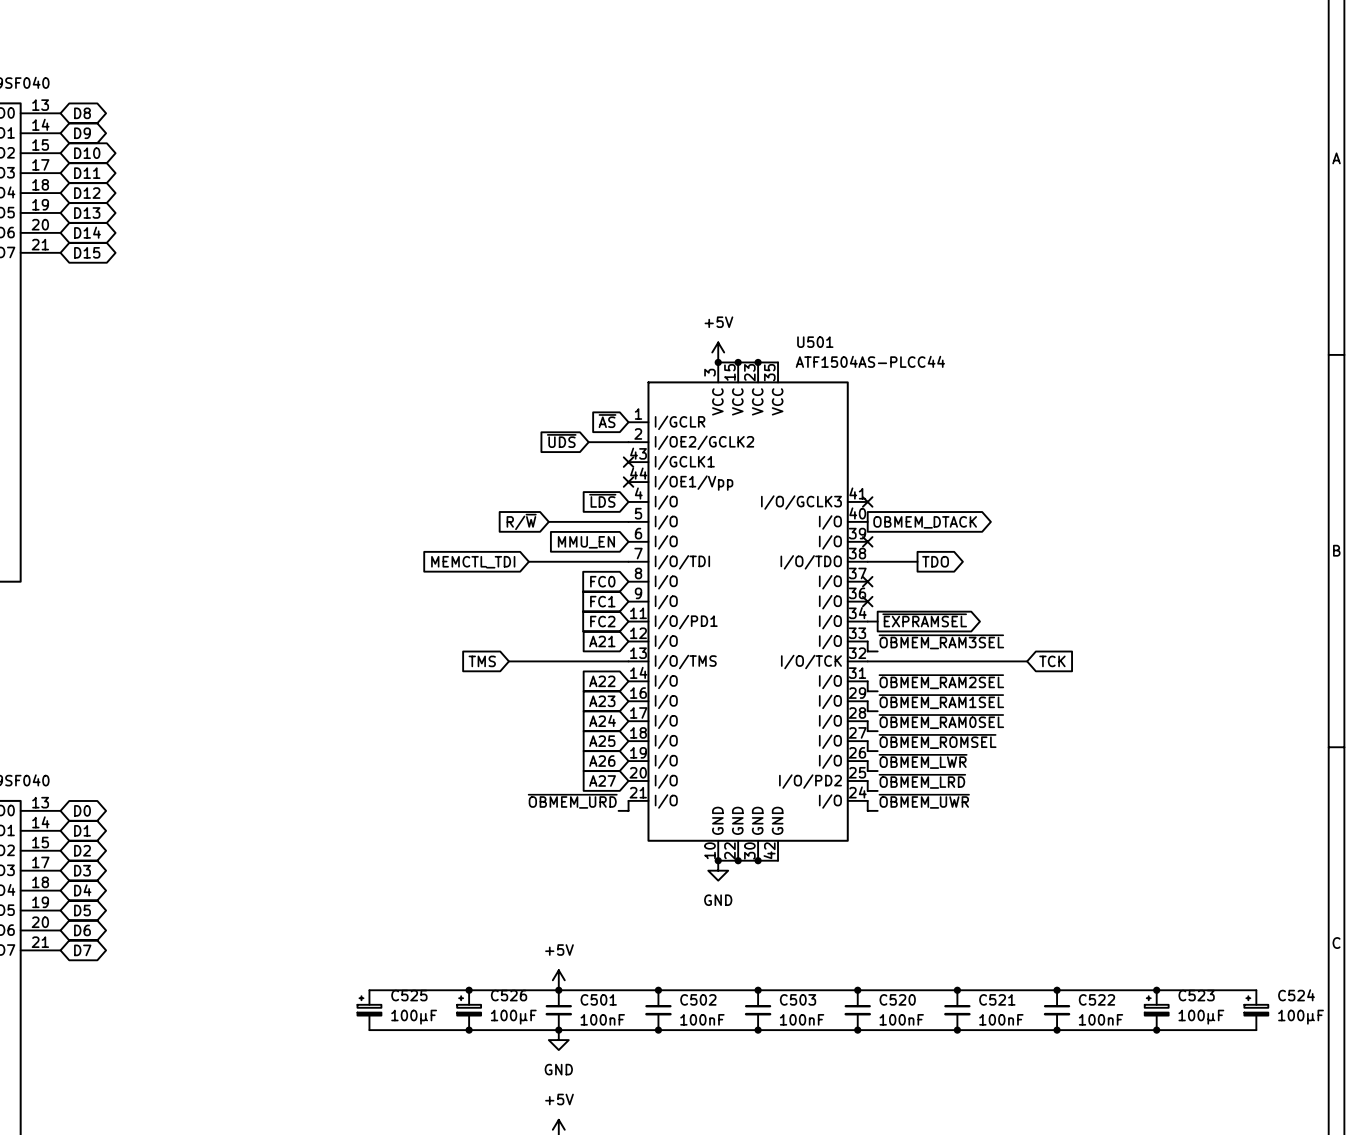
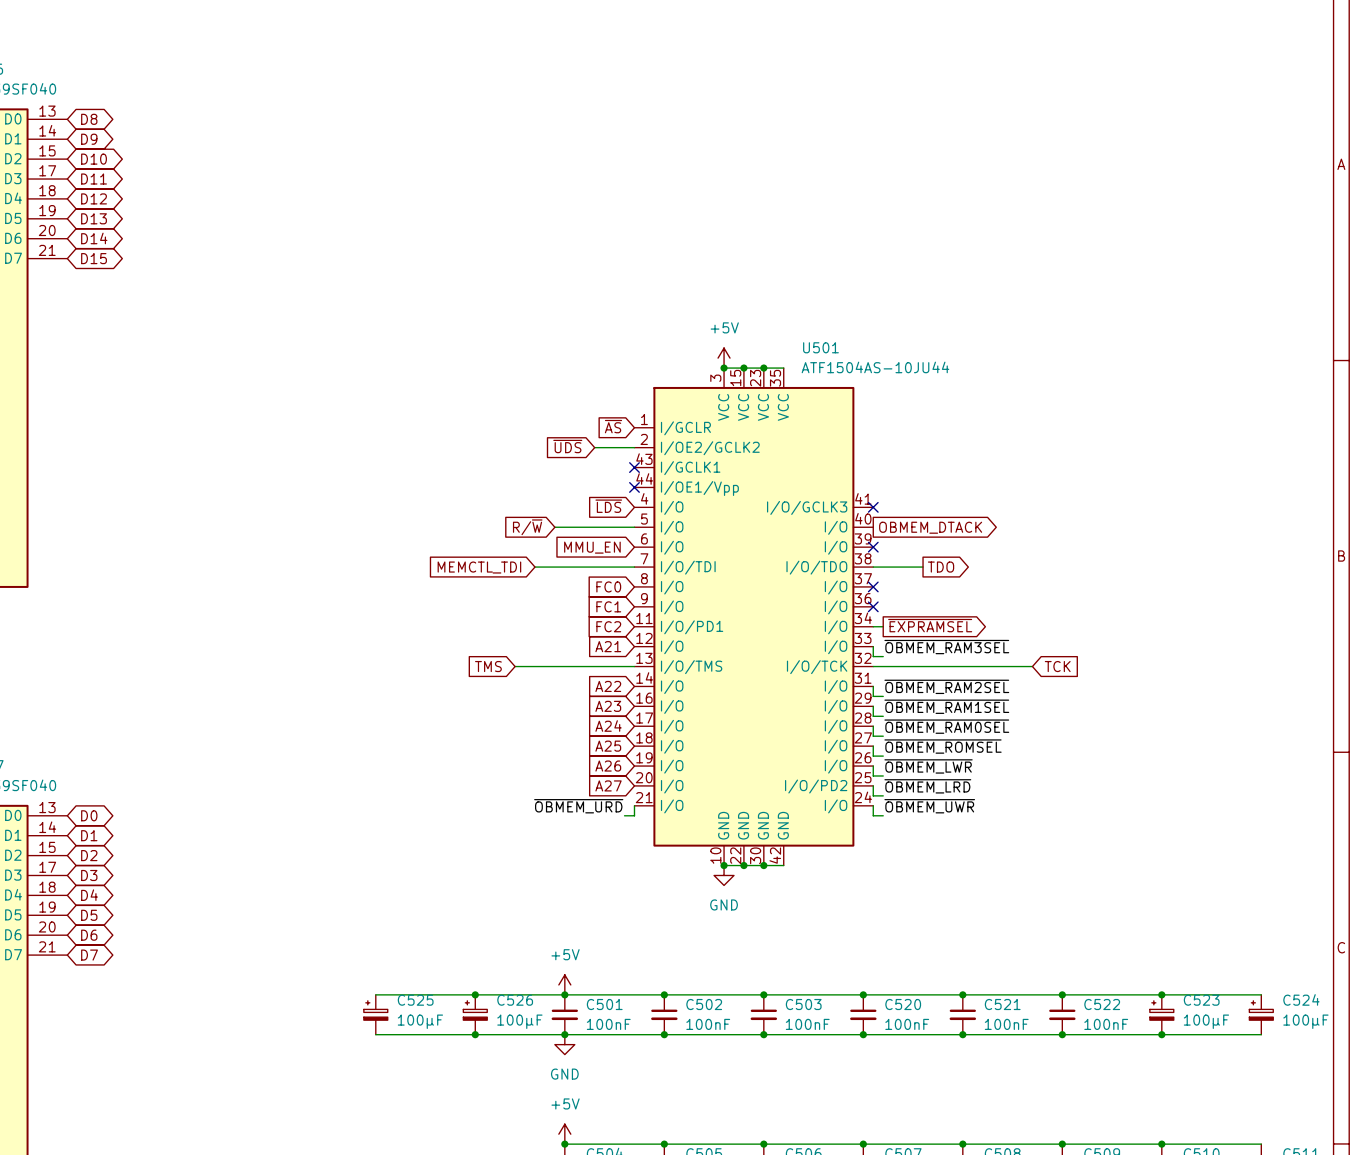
U501 value: ATF1504AS-PLCC44 (870, 361) -> ATF1504AS-10JU44 (875, 367)

